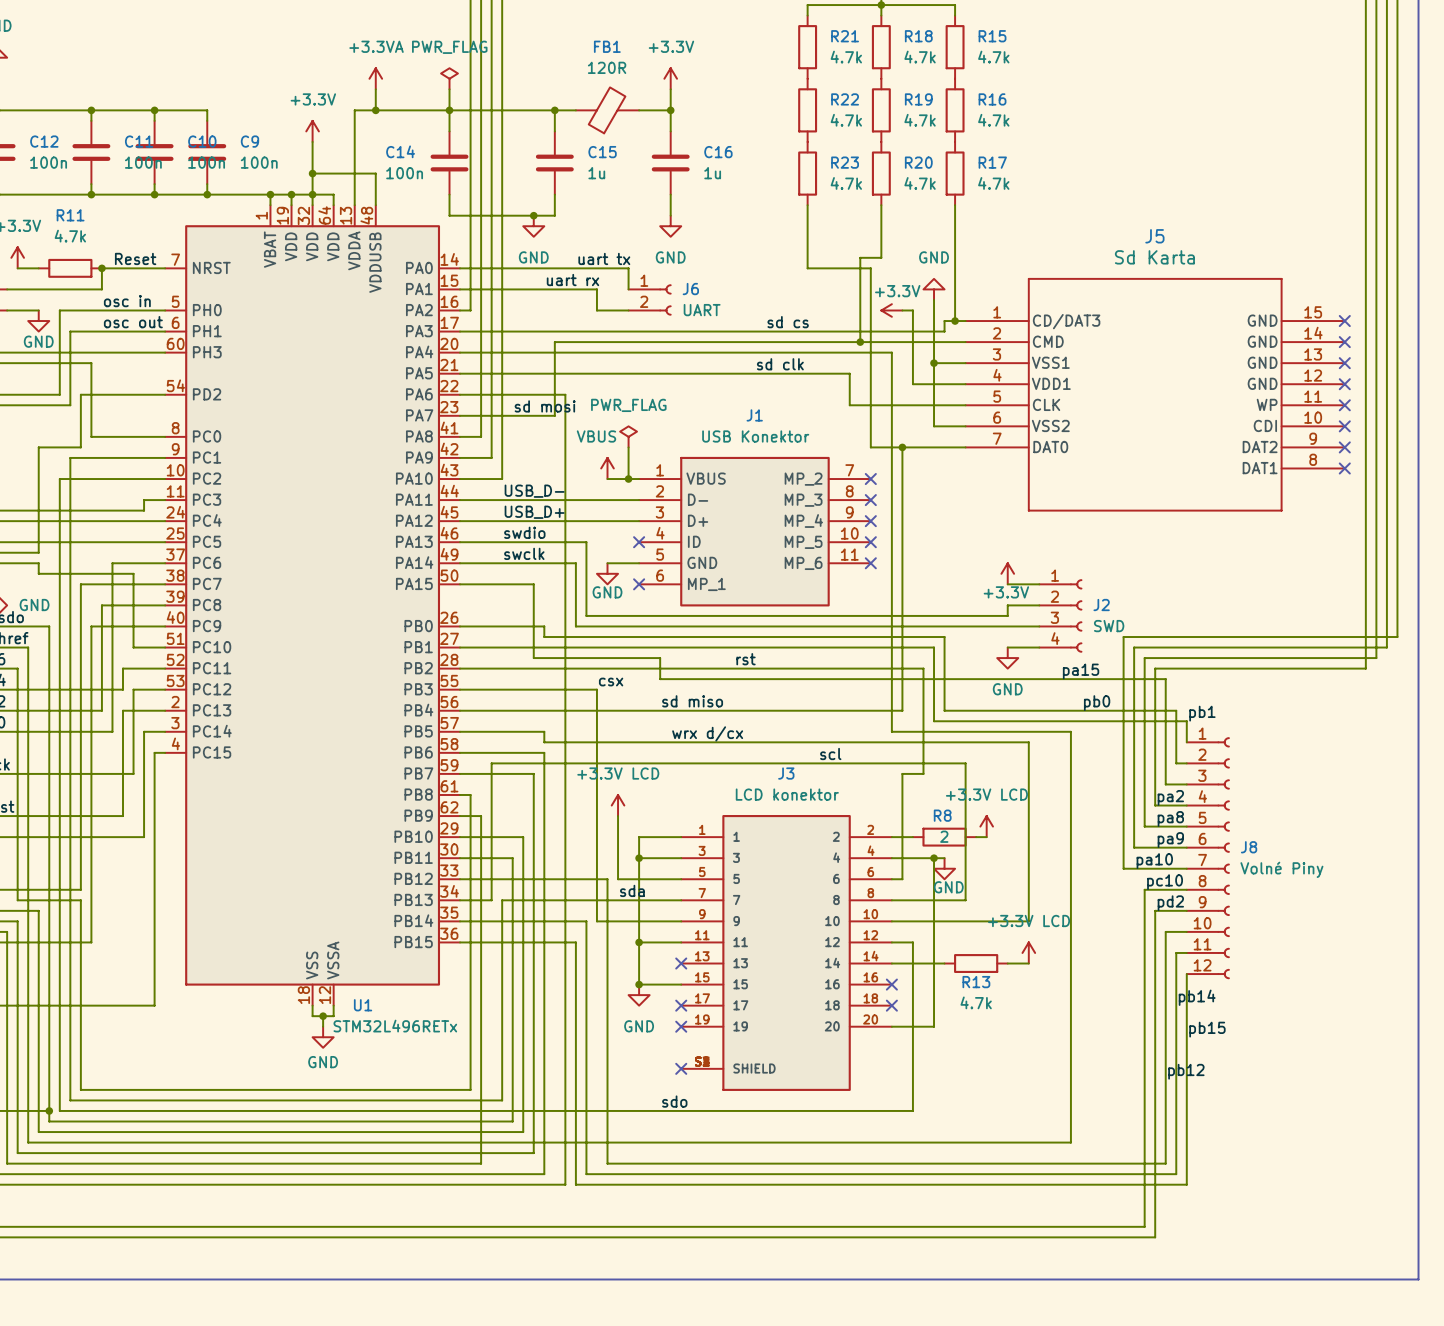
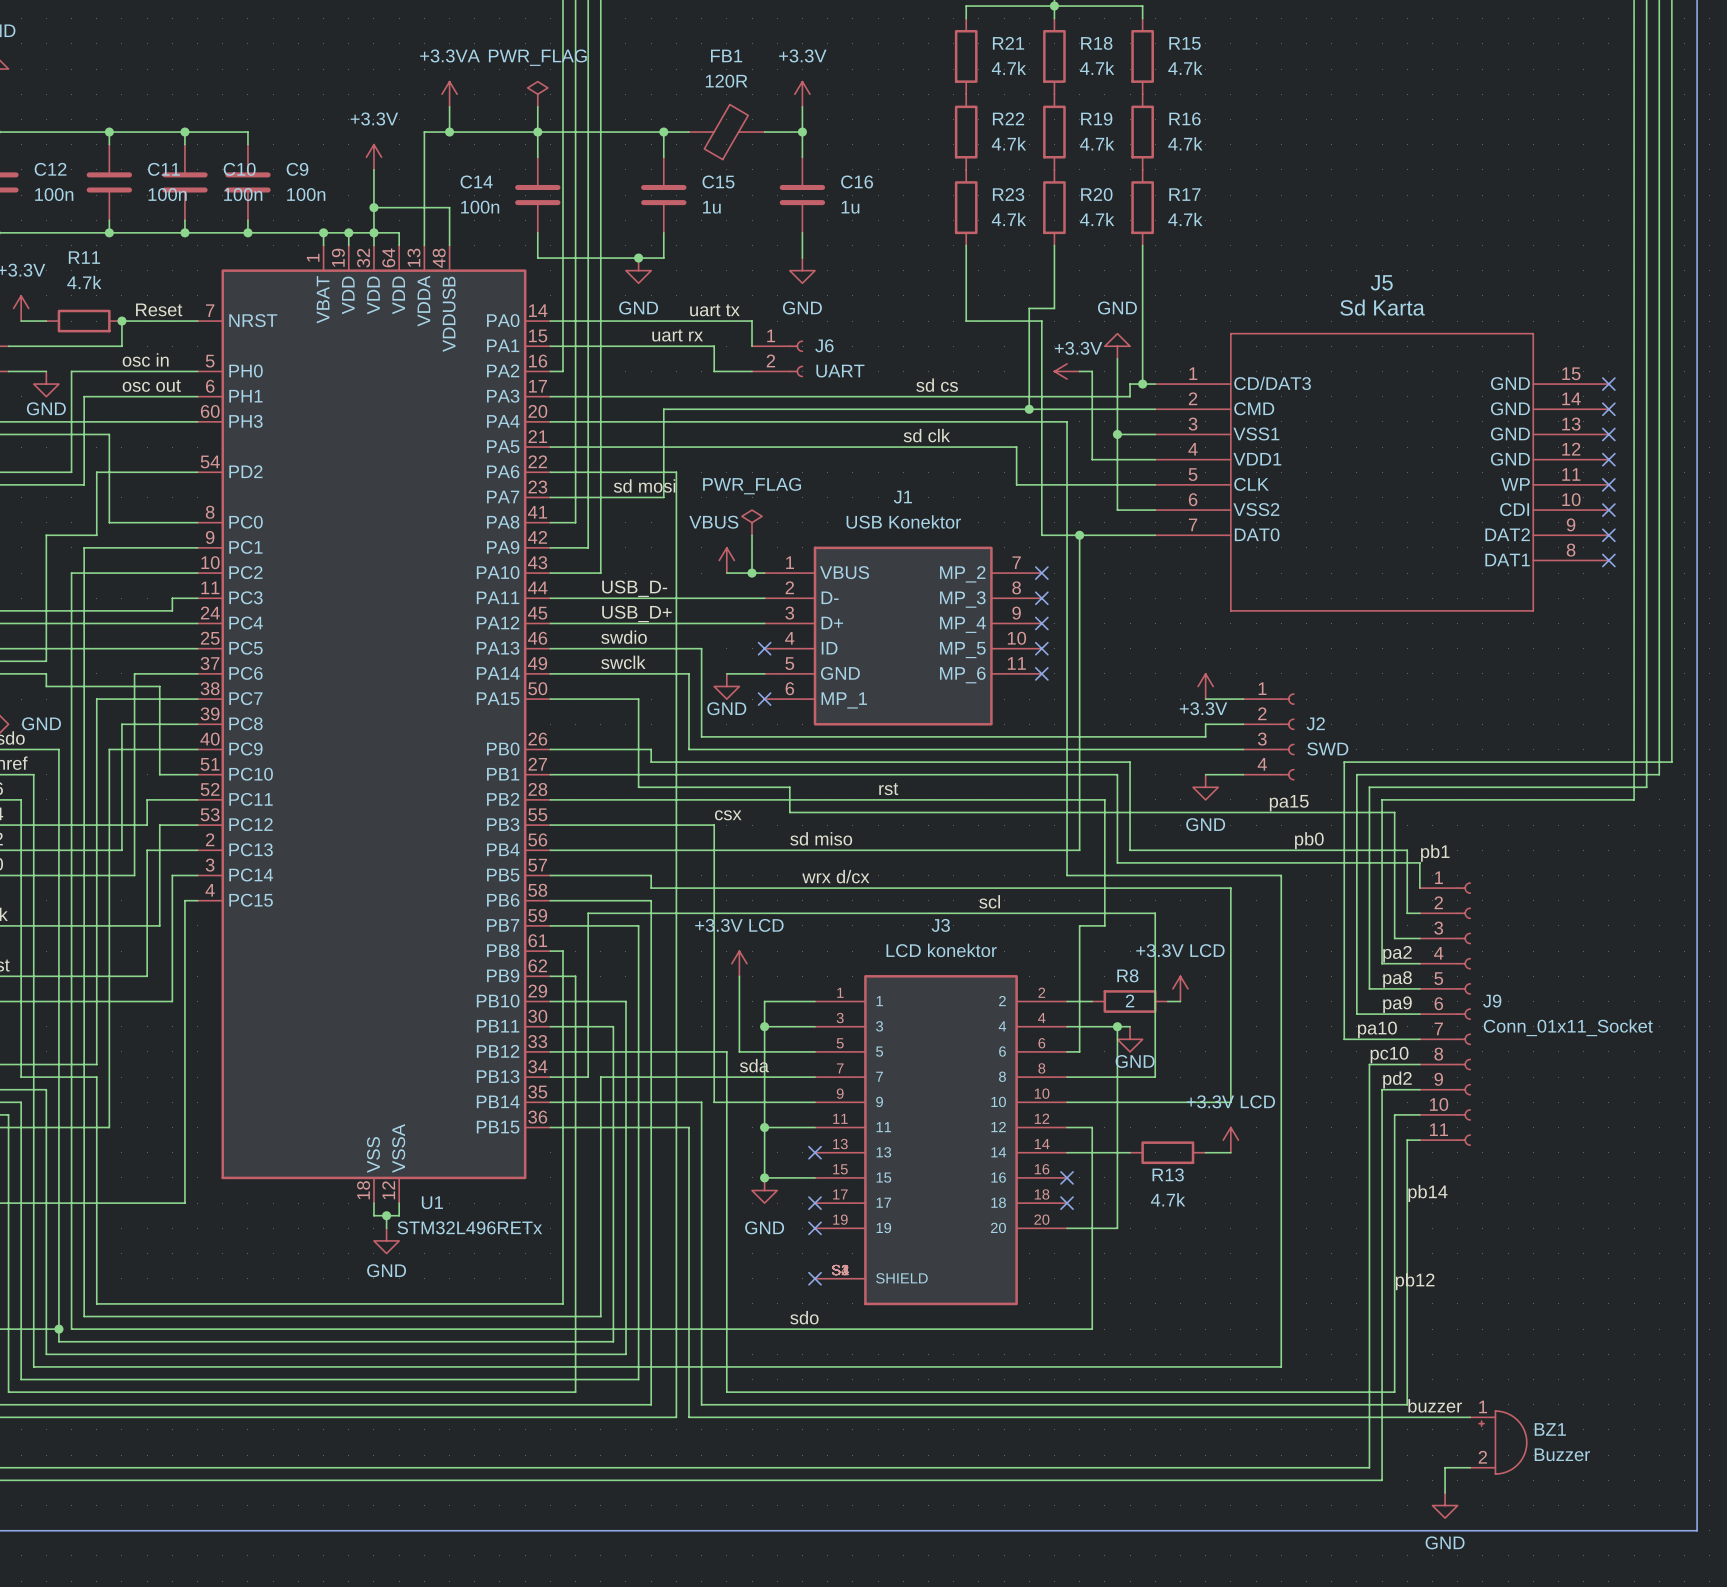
J9: none -> Conn_01x11_Socket (1445, 1014)
J8: Volné Piny (1208, 858) -> none
wire: (1186, 974) (1186, 1184) -> (1470, 1417) (1419, 1417)
label: pb15 (1207, 1029) -> none
label: none -> buzzer (1435, 1405)
BZ1: none -> Buzzer (1498, 1442)
wire: none -> (1470, 1467) (1445, 1467) (1445, 1492)
power symbol: none -> GND (1445, 1505)

